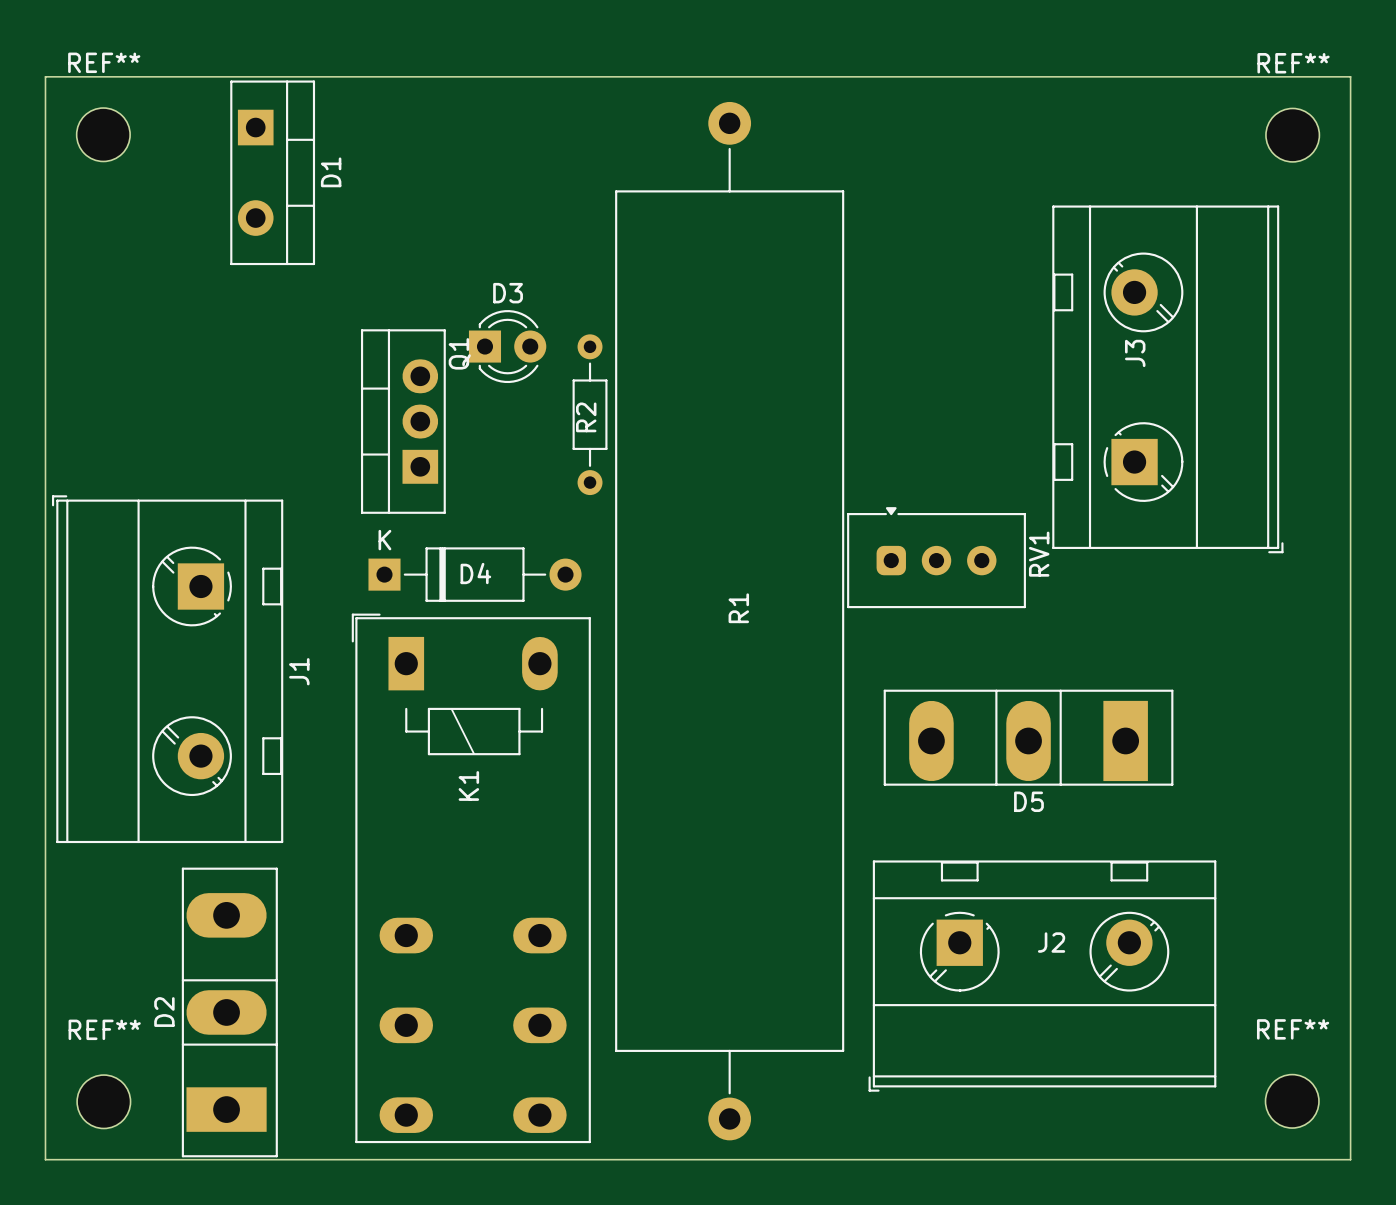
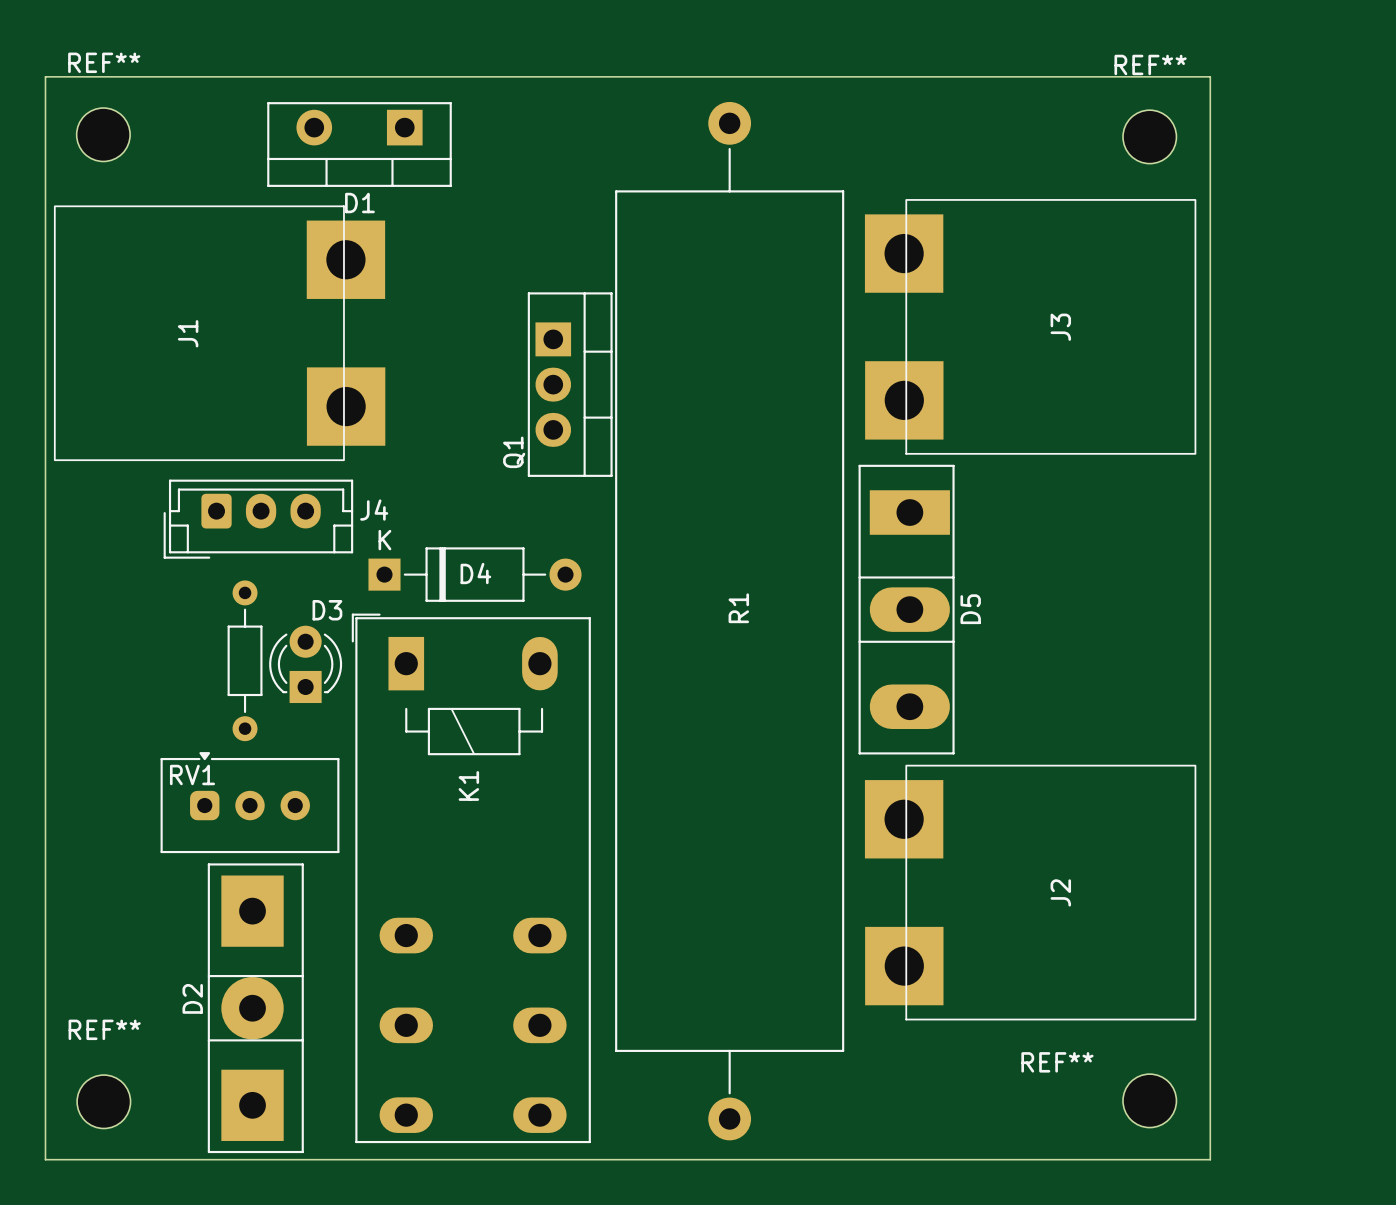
board edge: (1210, 76) (1350, 76) (1350, 1159) (1210, 1159) -> (1210, 76) (1210, 1159)
REF** position: (1292, 135) -> (1149, 136)
D1 rotation: 0° (272, 172) -> 90° clockwise (359, 144)
J3 footprint: [1052, 205, 1284, 554] -> [864, 199, 1197, 455]
D3 rotation: 0° (507, 346) -> 90° counterclockwise (305, 664)
D3 position: (507, 346) -> (305, 664)
J3 name position: J3 (1135, 353) -> J3 (1060, 327)
R2: (590, 414) -> none
Q1 rotation: 0° (403, 421) -> 180° (570, 384)
Q1 position: (403, 421) -> (570, 384)
J1 footprint: [51, 495, 284, 844] -> [53, 205, 386, 462]
J4: none -> (258, 519)
RV1 name rotation: 0° (1039, 554) -> 90° clockwise (192, 775)
RV1 name position: RV1 (1039, 554) -> RV1 (192, 775)
RV1 position: (936, 557) -> (250, 802)
part: none -> (245, 660)
J1 name position: J1 (299, 671) -> J1 (188, 333)
D5 rotation: 0° (1028, 737) -> 90° counterclockwise (906, 609)
D5 position: (1028, 737) -> (906, 609)
J2 footprint: [868, 860, 1217, 1092] -> [864, 764, 1197, 1021]
D2 footprint: [181, 867, 278, 1158] -> [207, 863, 304, 1154]
J2 name position: J2 (1051, 942) -> J2 (1060, 892)
REF** name position: REF** (1293, 1029) -> REF** (1057, 1062)
REF** position: (1292, 1101) -> (1149, 1100)

